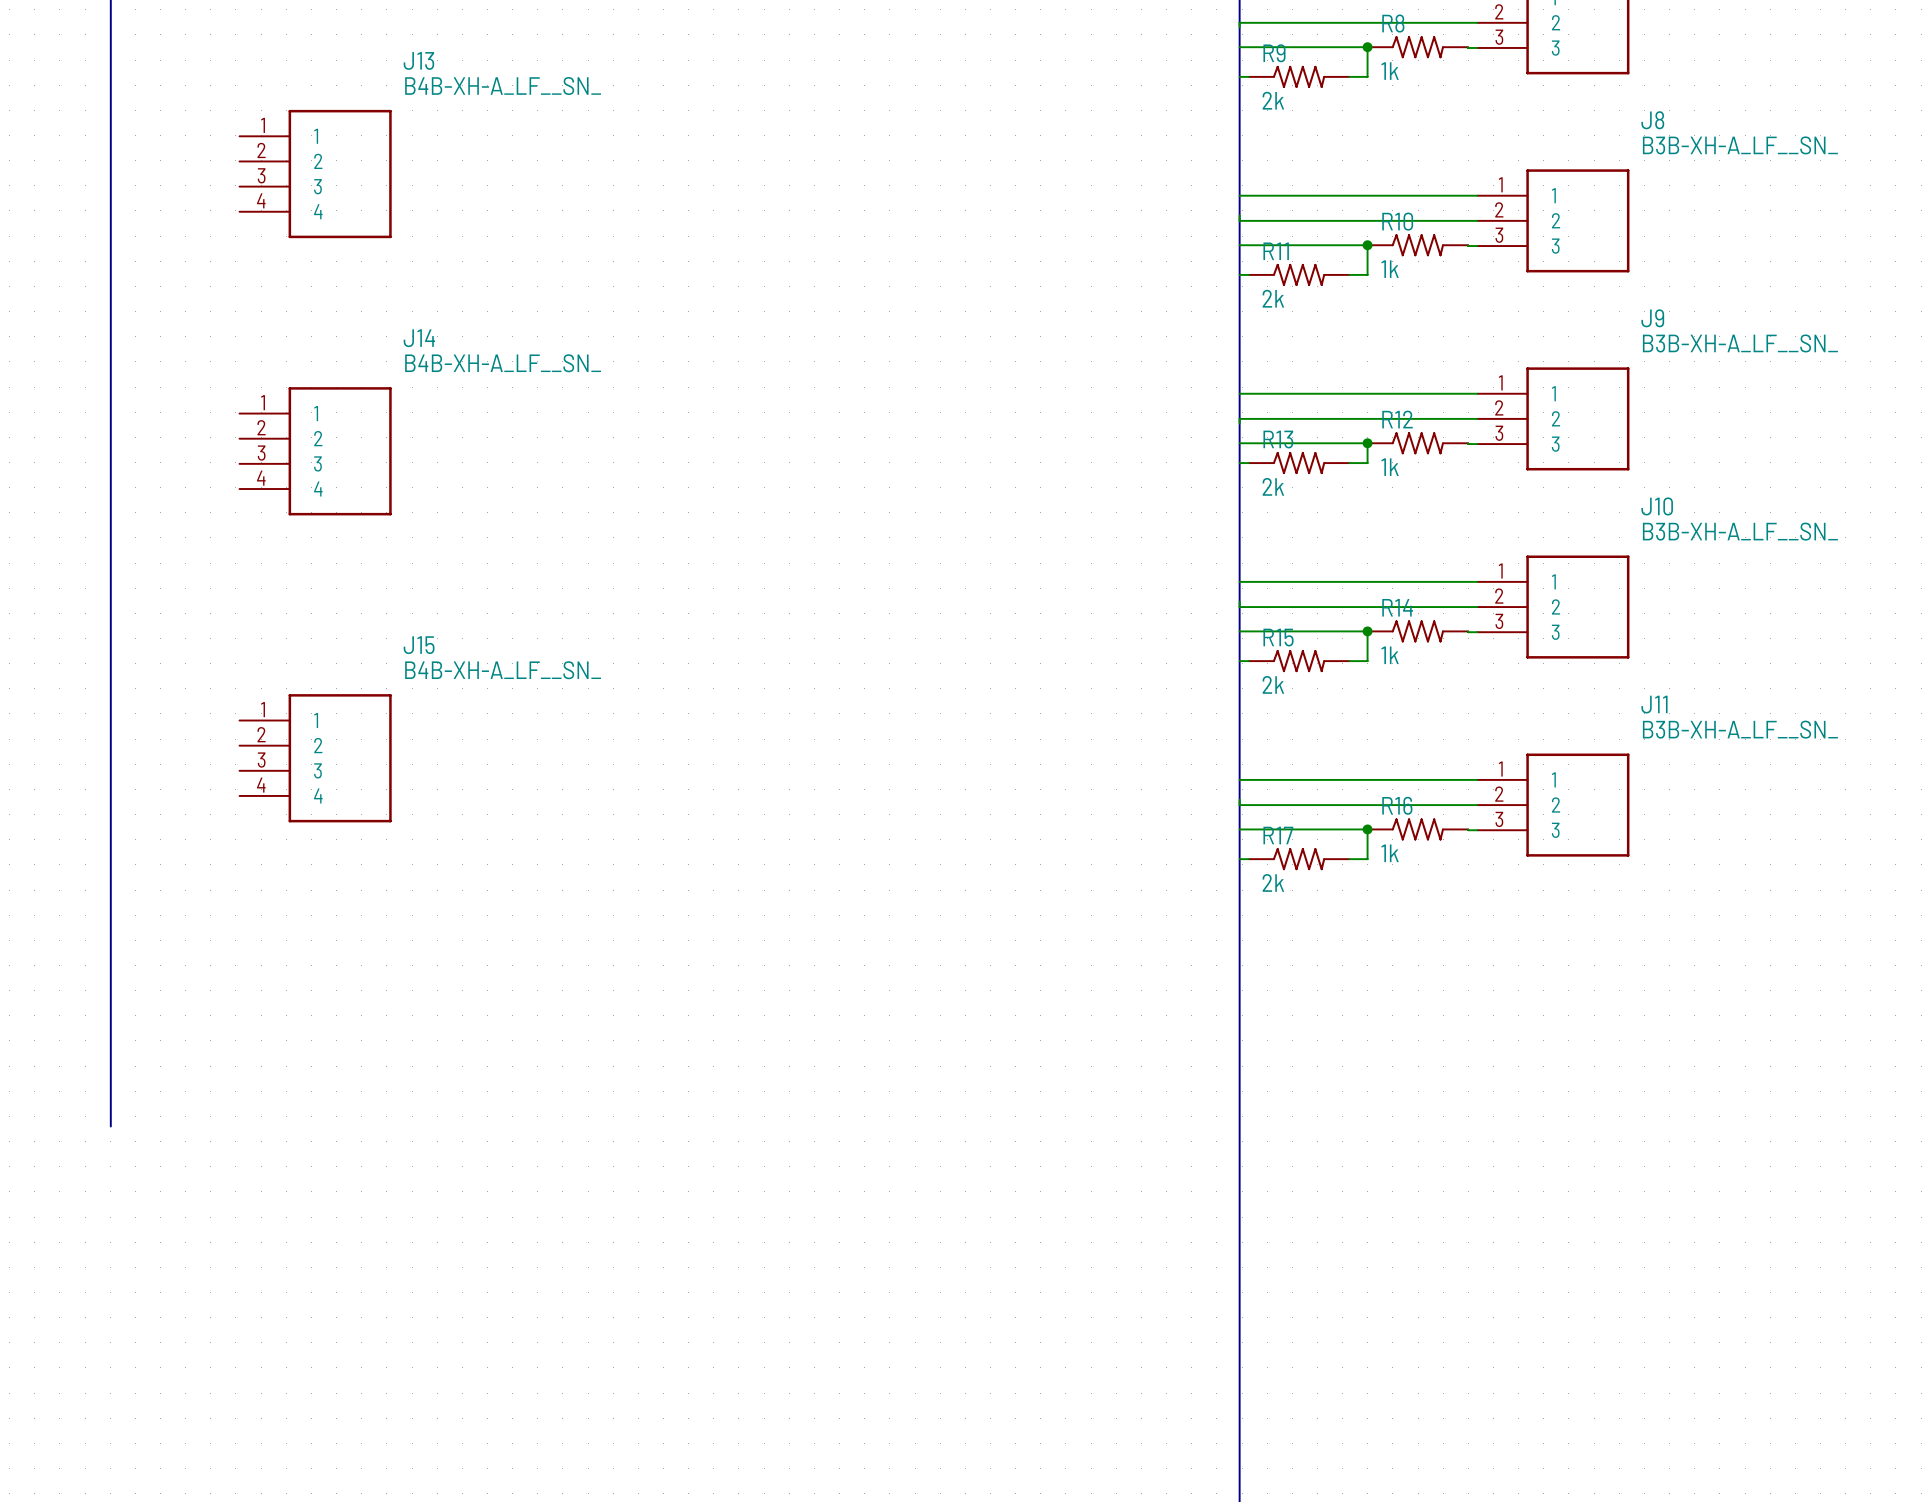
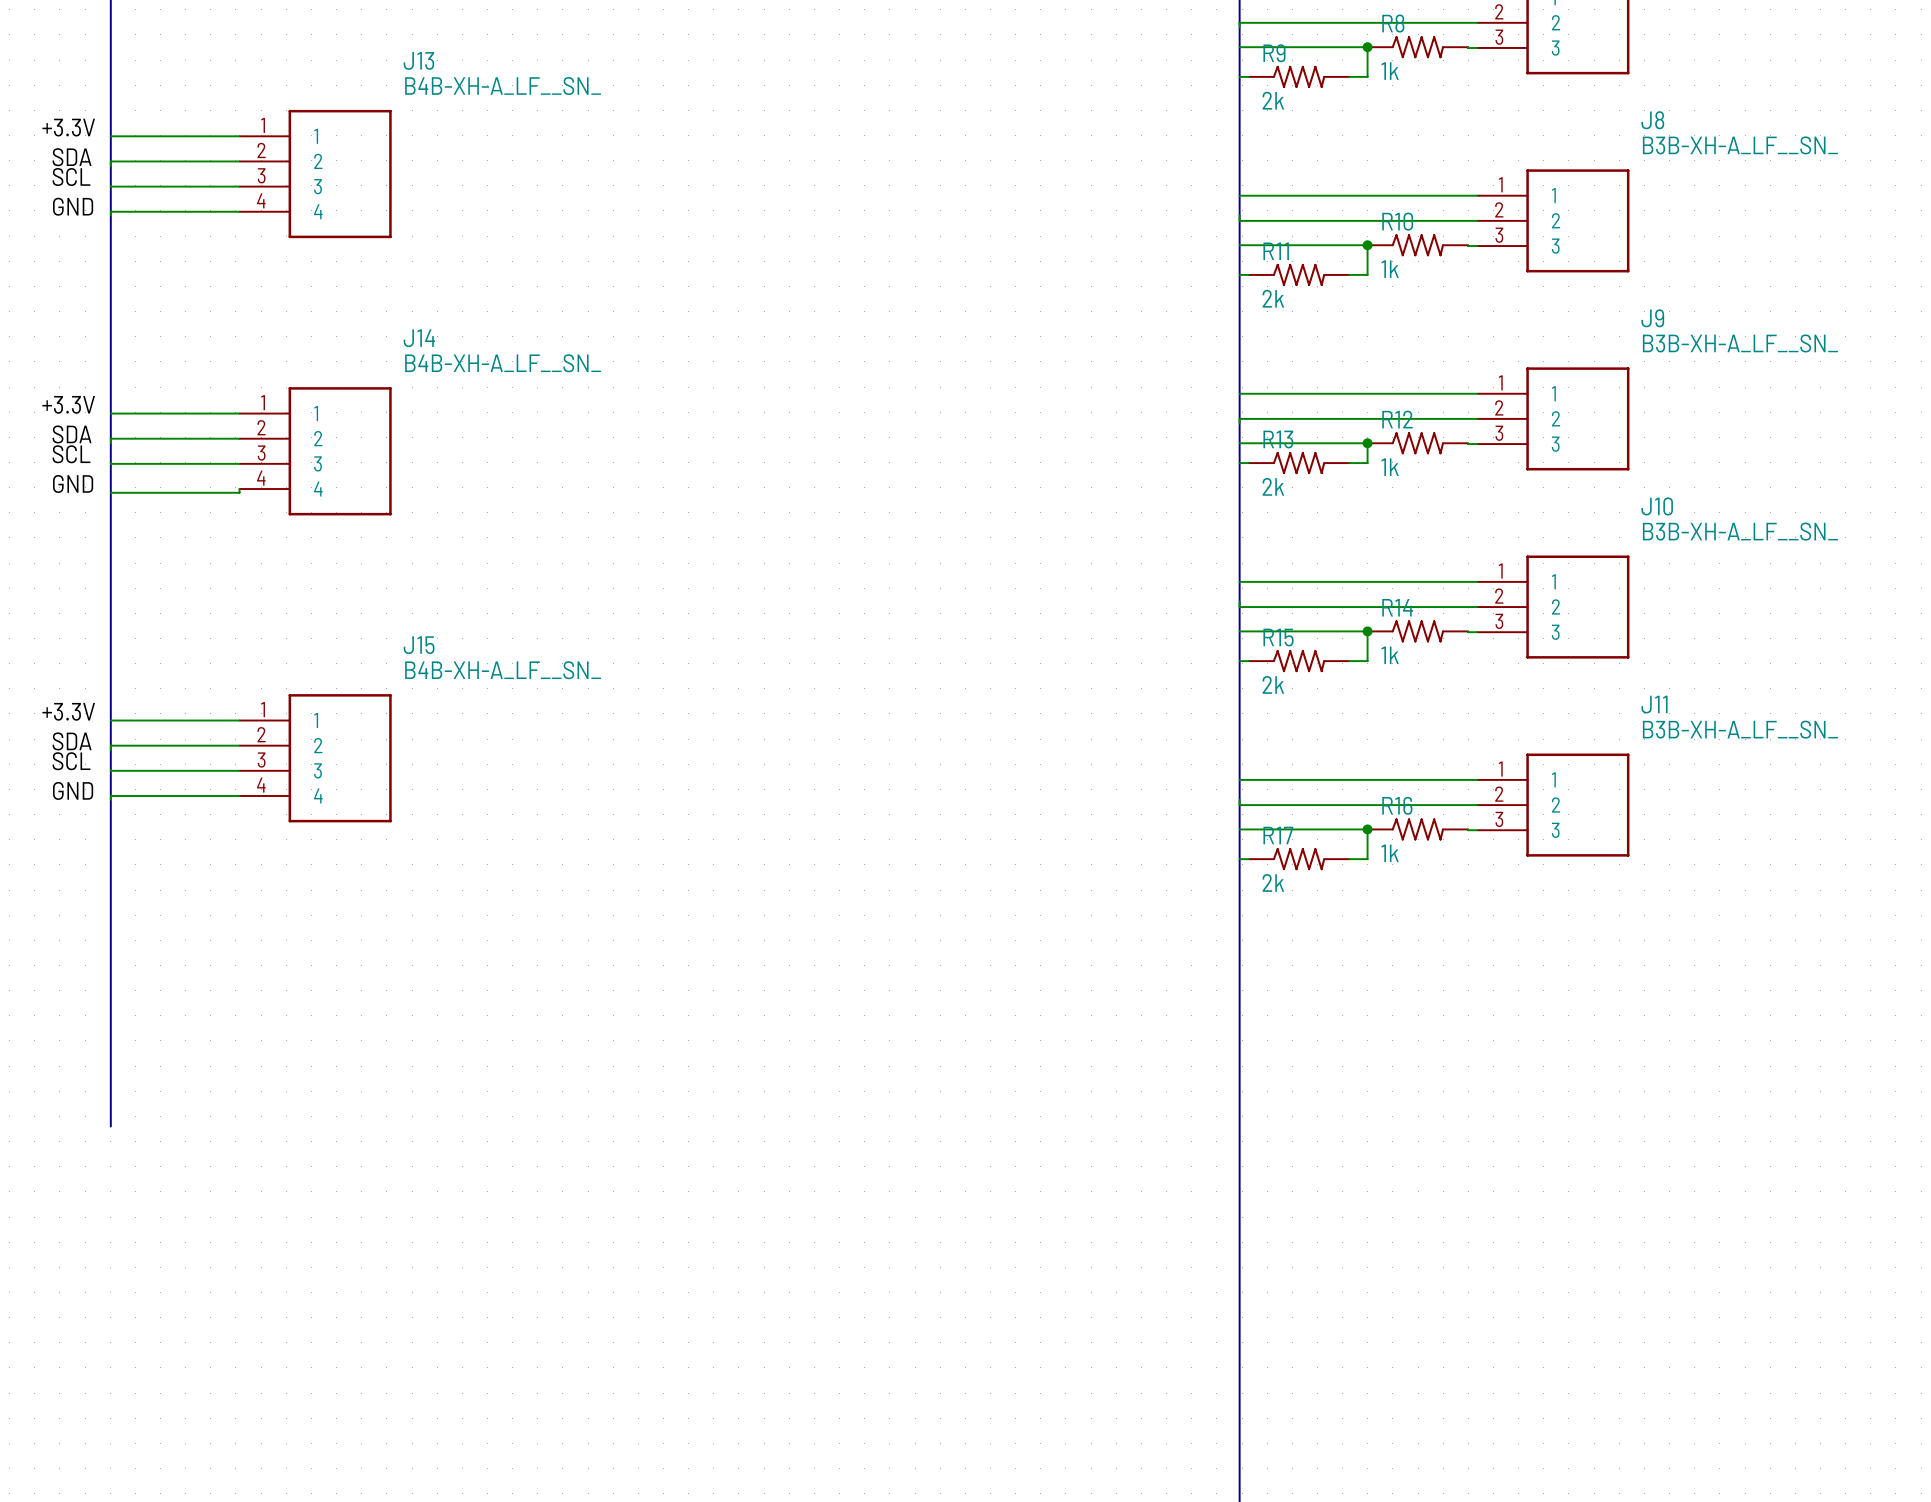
label: none -> +3.3V (68, 127)
wire: none -> (110, 136) (239, 136)
label: none -> SDA (72, 157)
wire: none -> (239, 161) (110, 161) (110, 166)
label: none -> SCL (71, 177)
wire: none -> (110, 185) (239, 186)
label: none -> GND (73, 206)
wire: none -> (239, 211) (110, 211) (110, 215)
label: none -> +3.3V (68, 404)
wire: none -> (110, 413) (239, 413)
label: none -> SDA (72, 434)
wire: none -> (239, 438) (110, 438) (110, 443)
label: none -> SCL (71, 454)
wire: none -> (110, 463) (239, 463)
label: none -> GND (73, 483)
wire: none -> (239, 489) (239, 492) (110, 492)
label: none -> +3.3V (68, 711)
wire: none -> (110, 720) (239, 720)
label: none -> SDA (72, 741)
wire: none -> (239, 745) (110, 745) (110, 750)
label: none -> SCL (71, 761)
wire: none -> (110, 770) (239, 770)
label: none -> GND (73, 790)
wire: none -> (239, 795) (110, 795) (110, 799)

